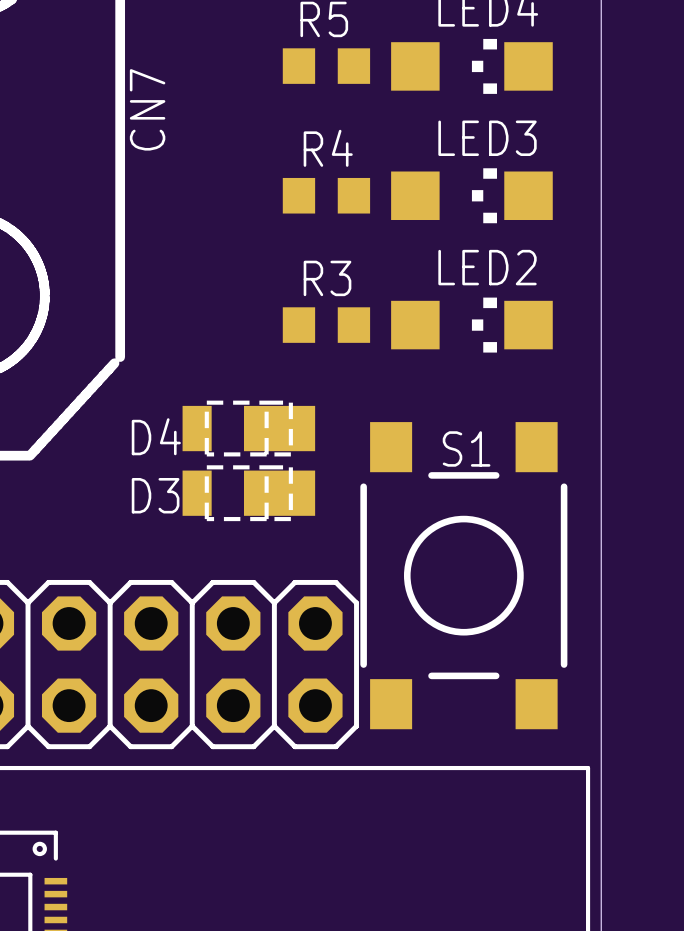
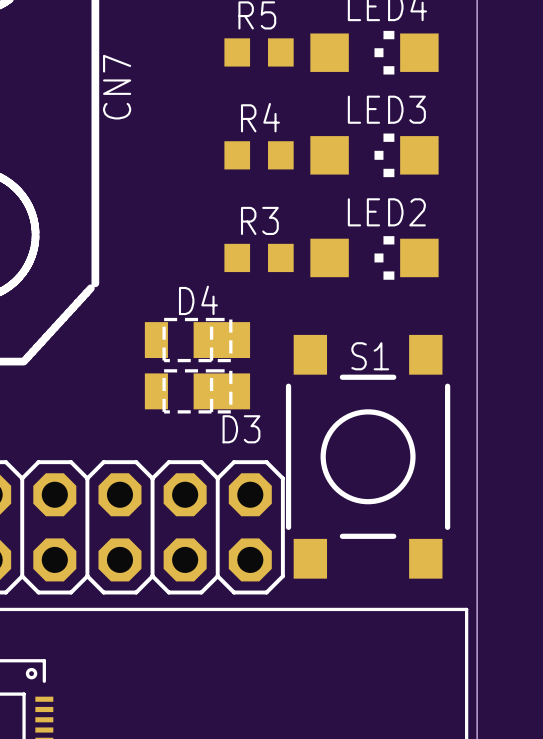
D4 name position: D4 (156, 436) -> D4 (198, 300)
D3 name position: D3 (155, 495) -> D3 (241, 429)

